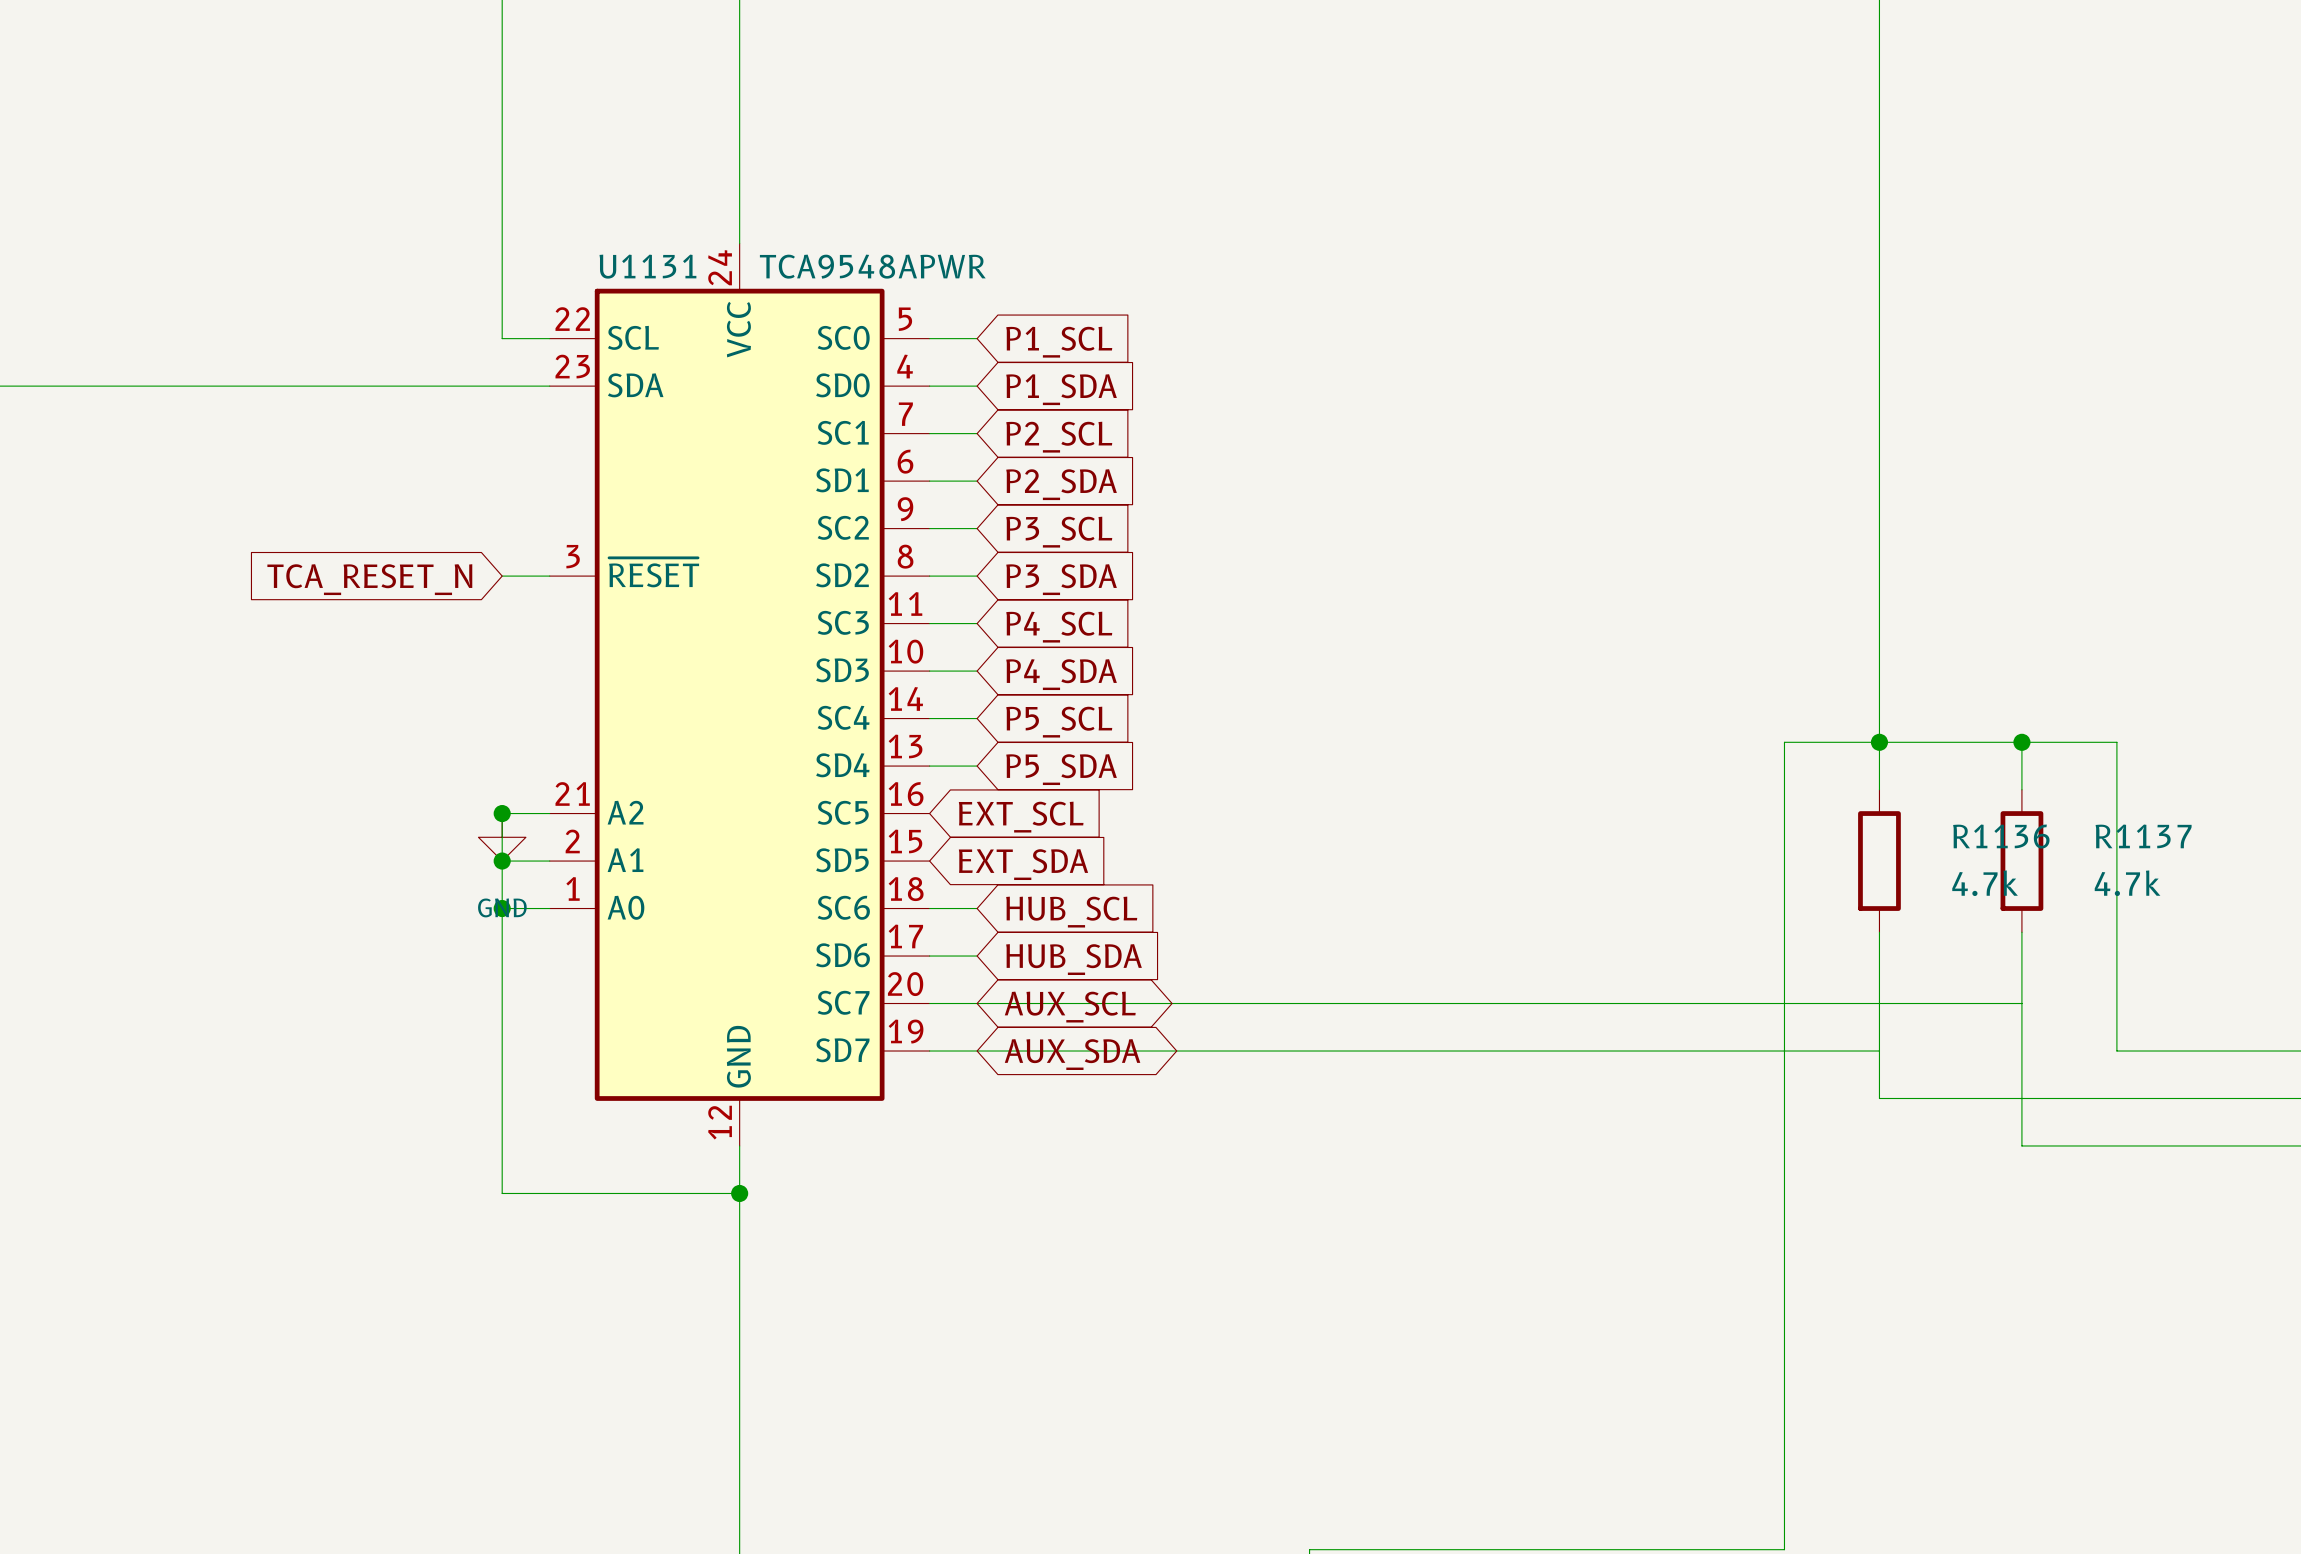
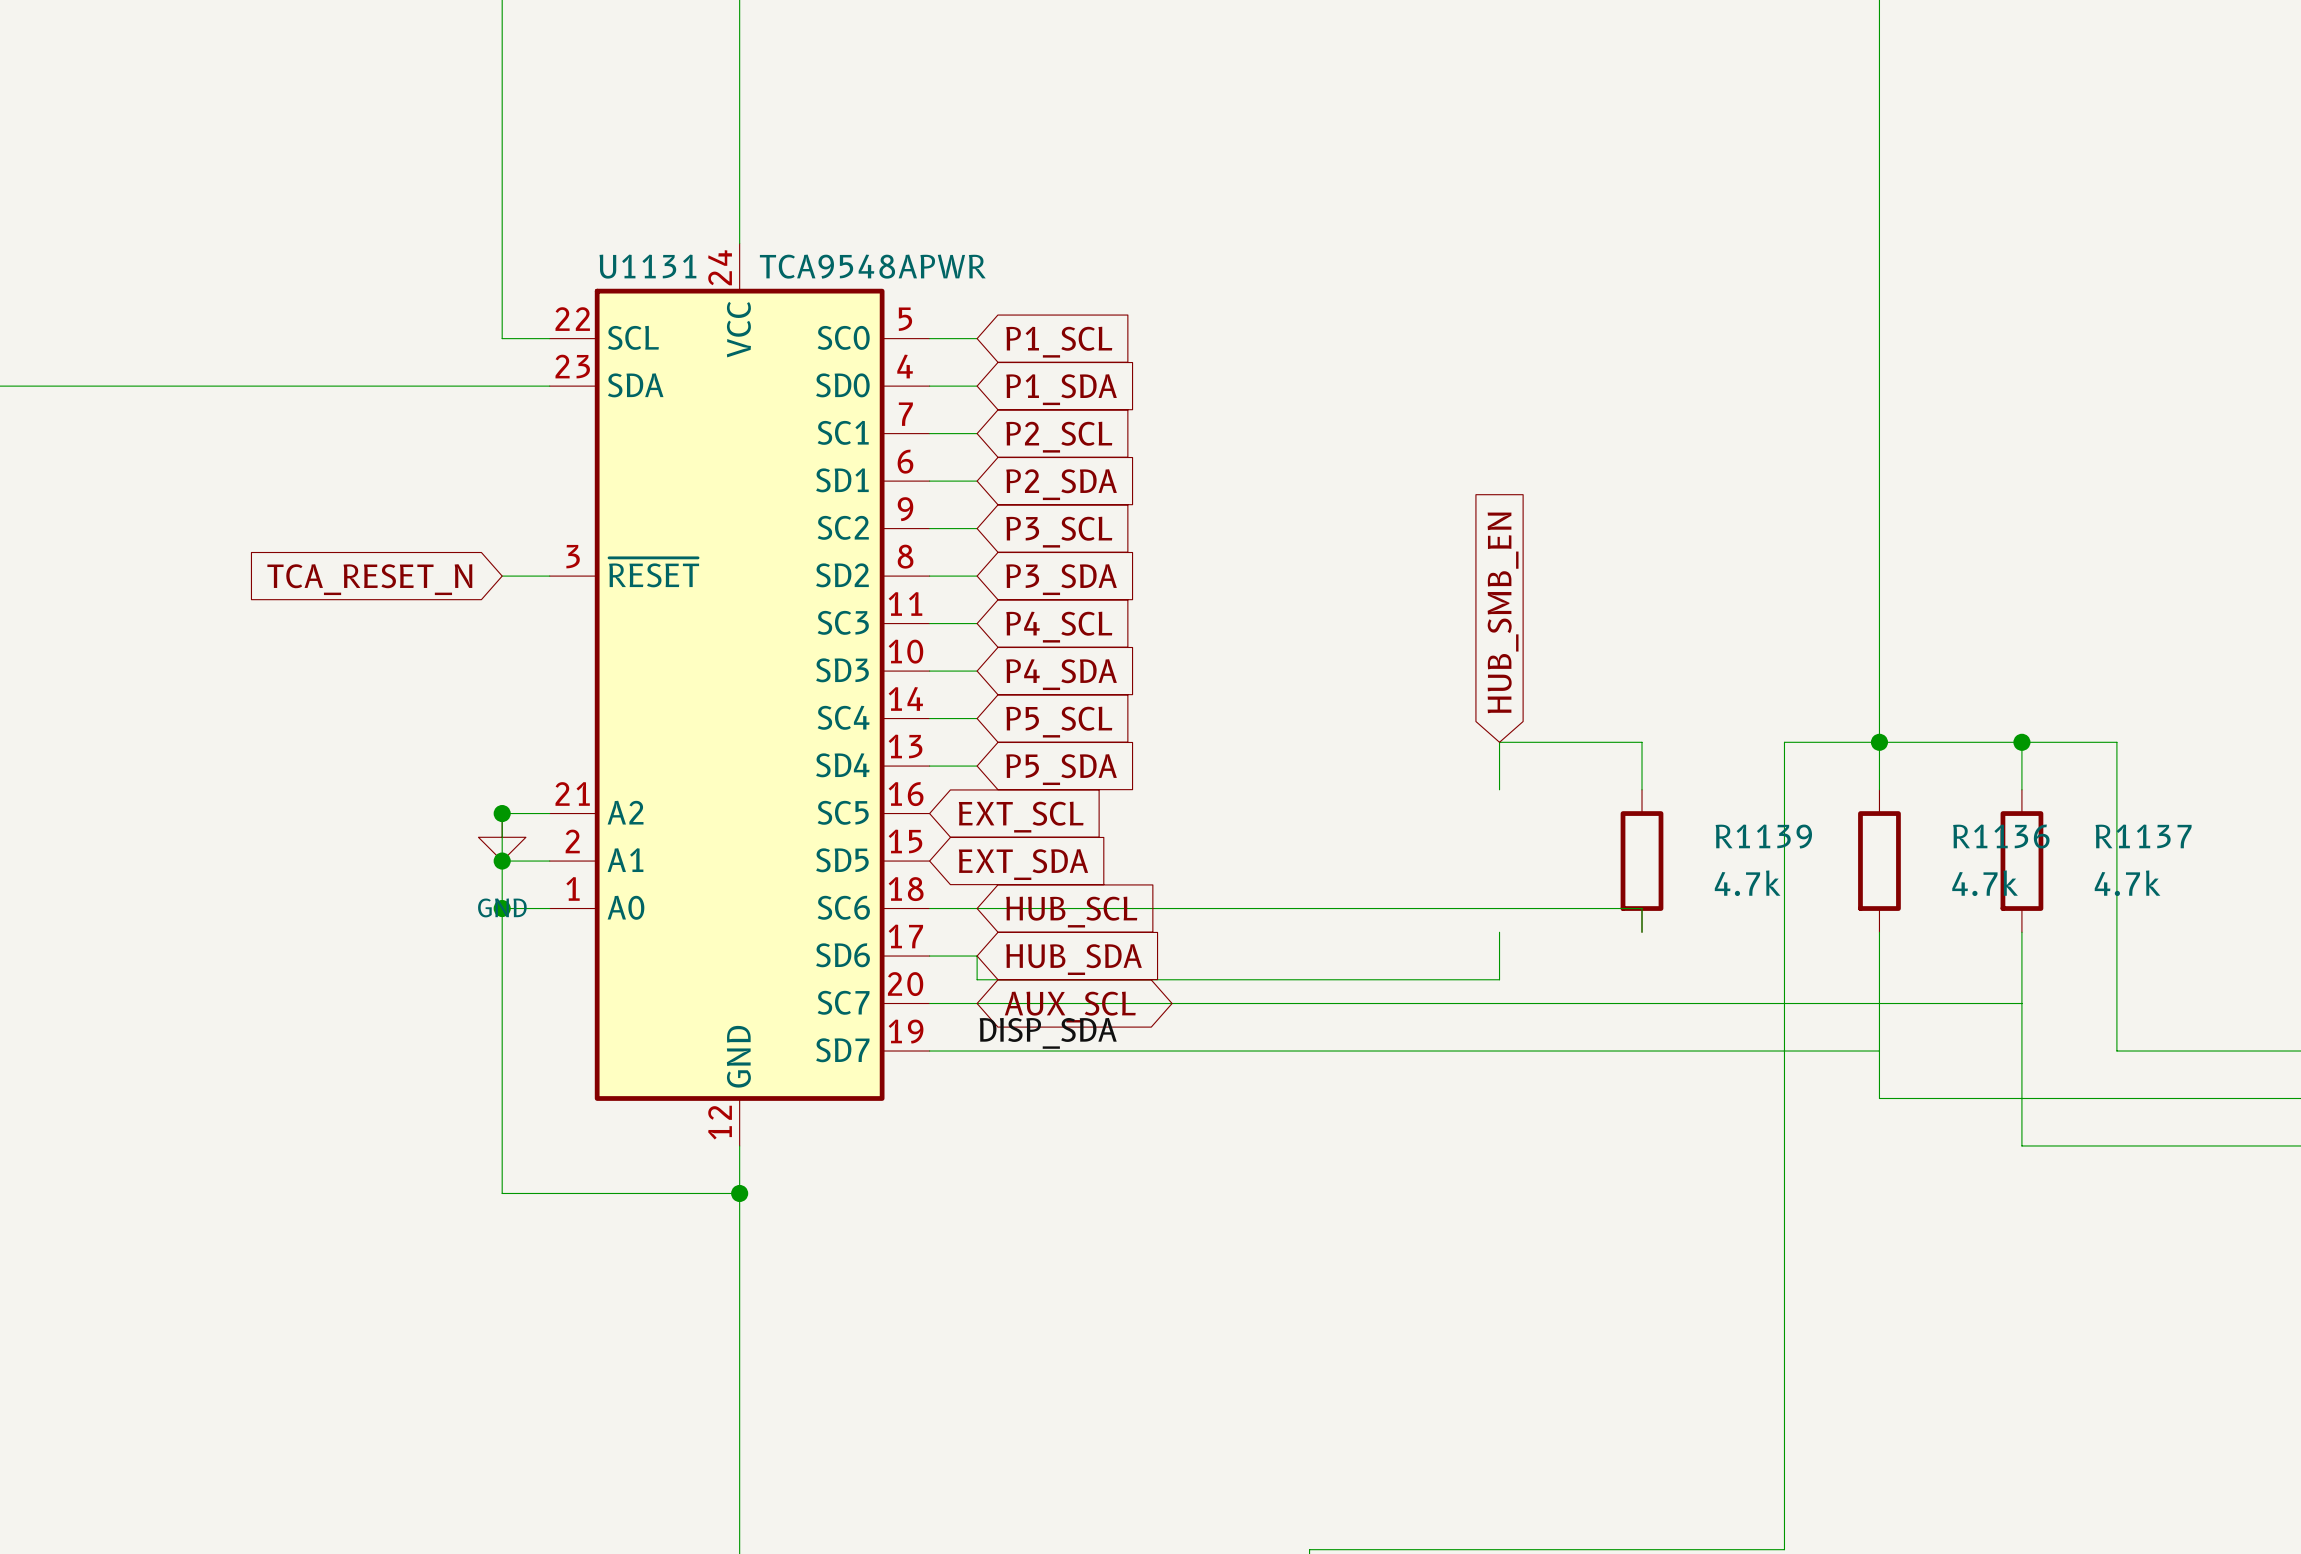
global label: none -> HUB_SMB_EN (1503, 612)
wire: none -> (1499, 789) (1499, 742) (1642, 742) (1642, 789)
R1139: none -> 4.7k (1642, 861)
wire: none -> (977, 908) (1642, 908) (1642, 932)
wire: none -> (1499, 932) (1499, 979) (977, 979) (977, 956)
label: none -> DISP_SDA (1048, 1033)
global label: AUX_SDA (1072, 1054) -> none

